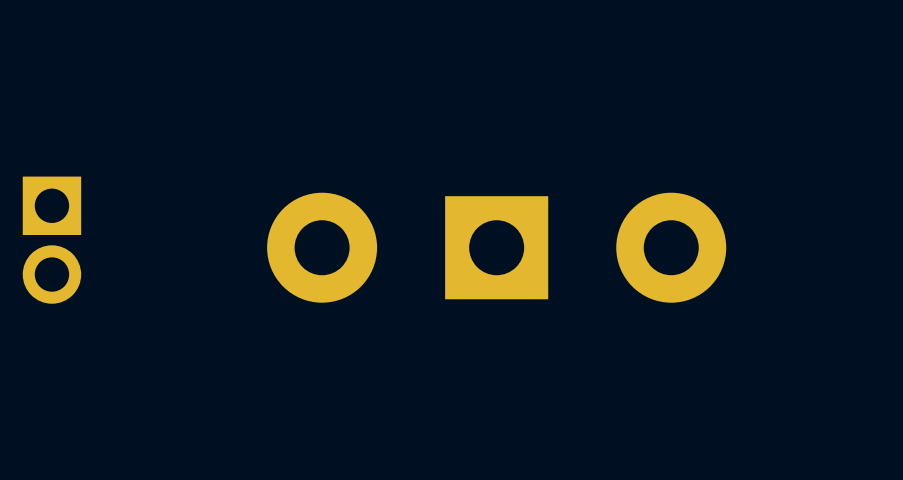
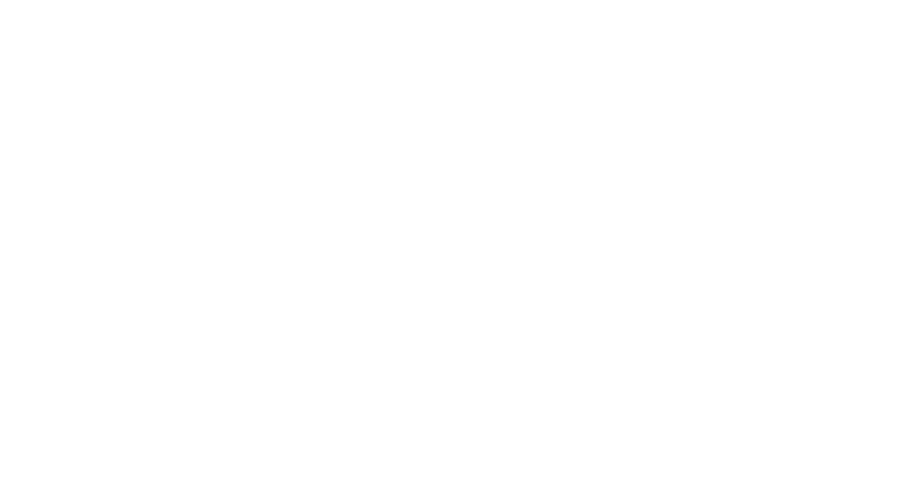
part: (51, 240) -> none
part: (496, 247) -> none

